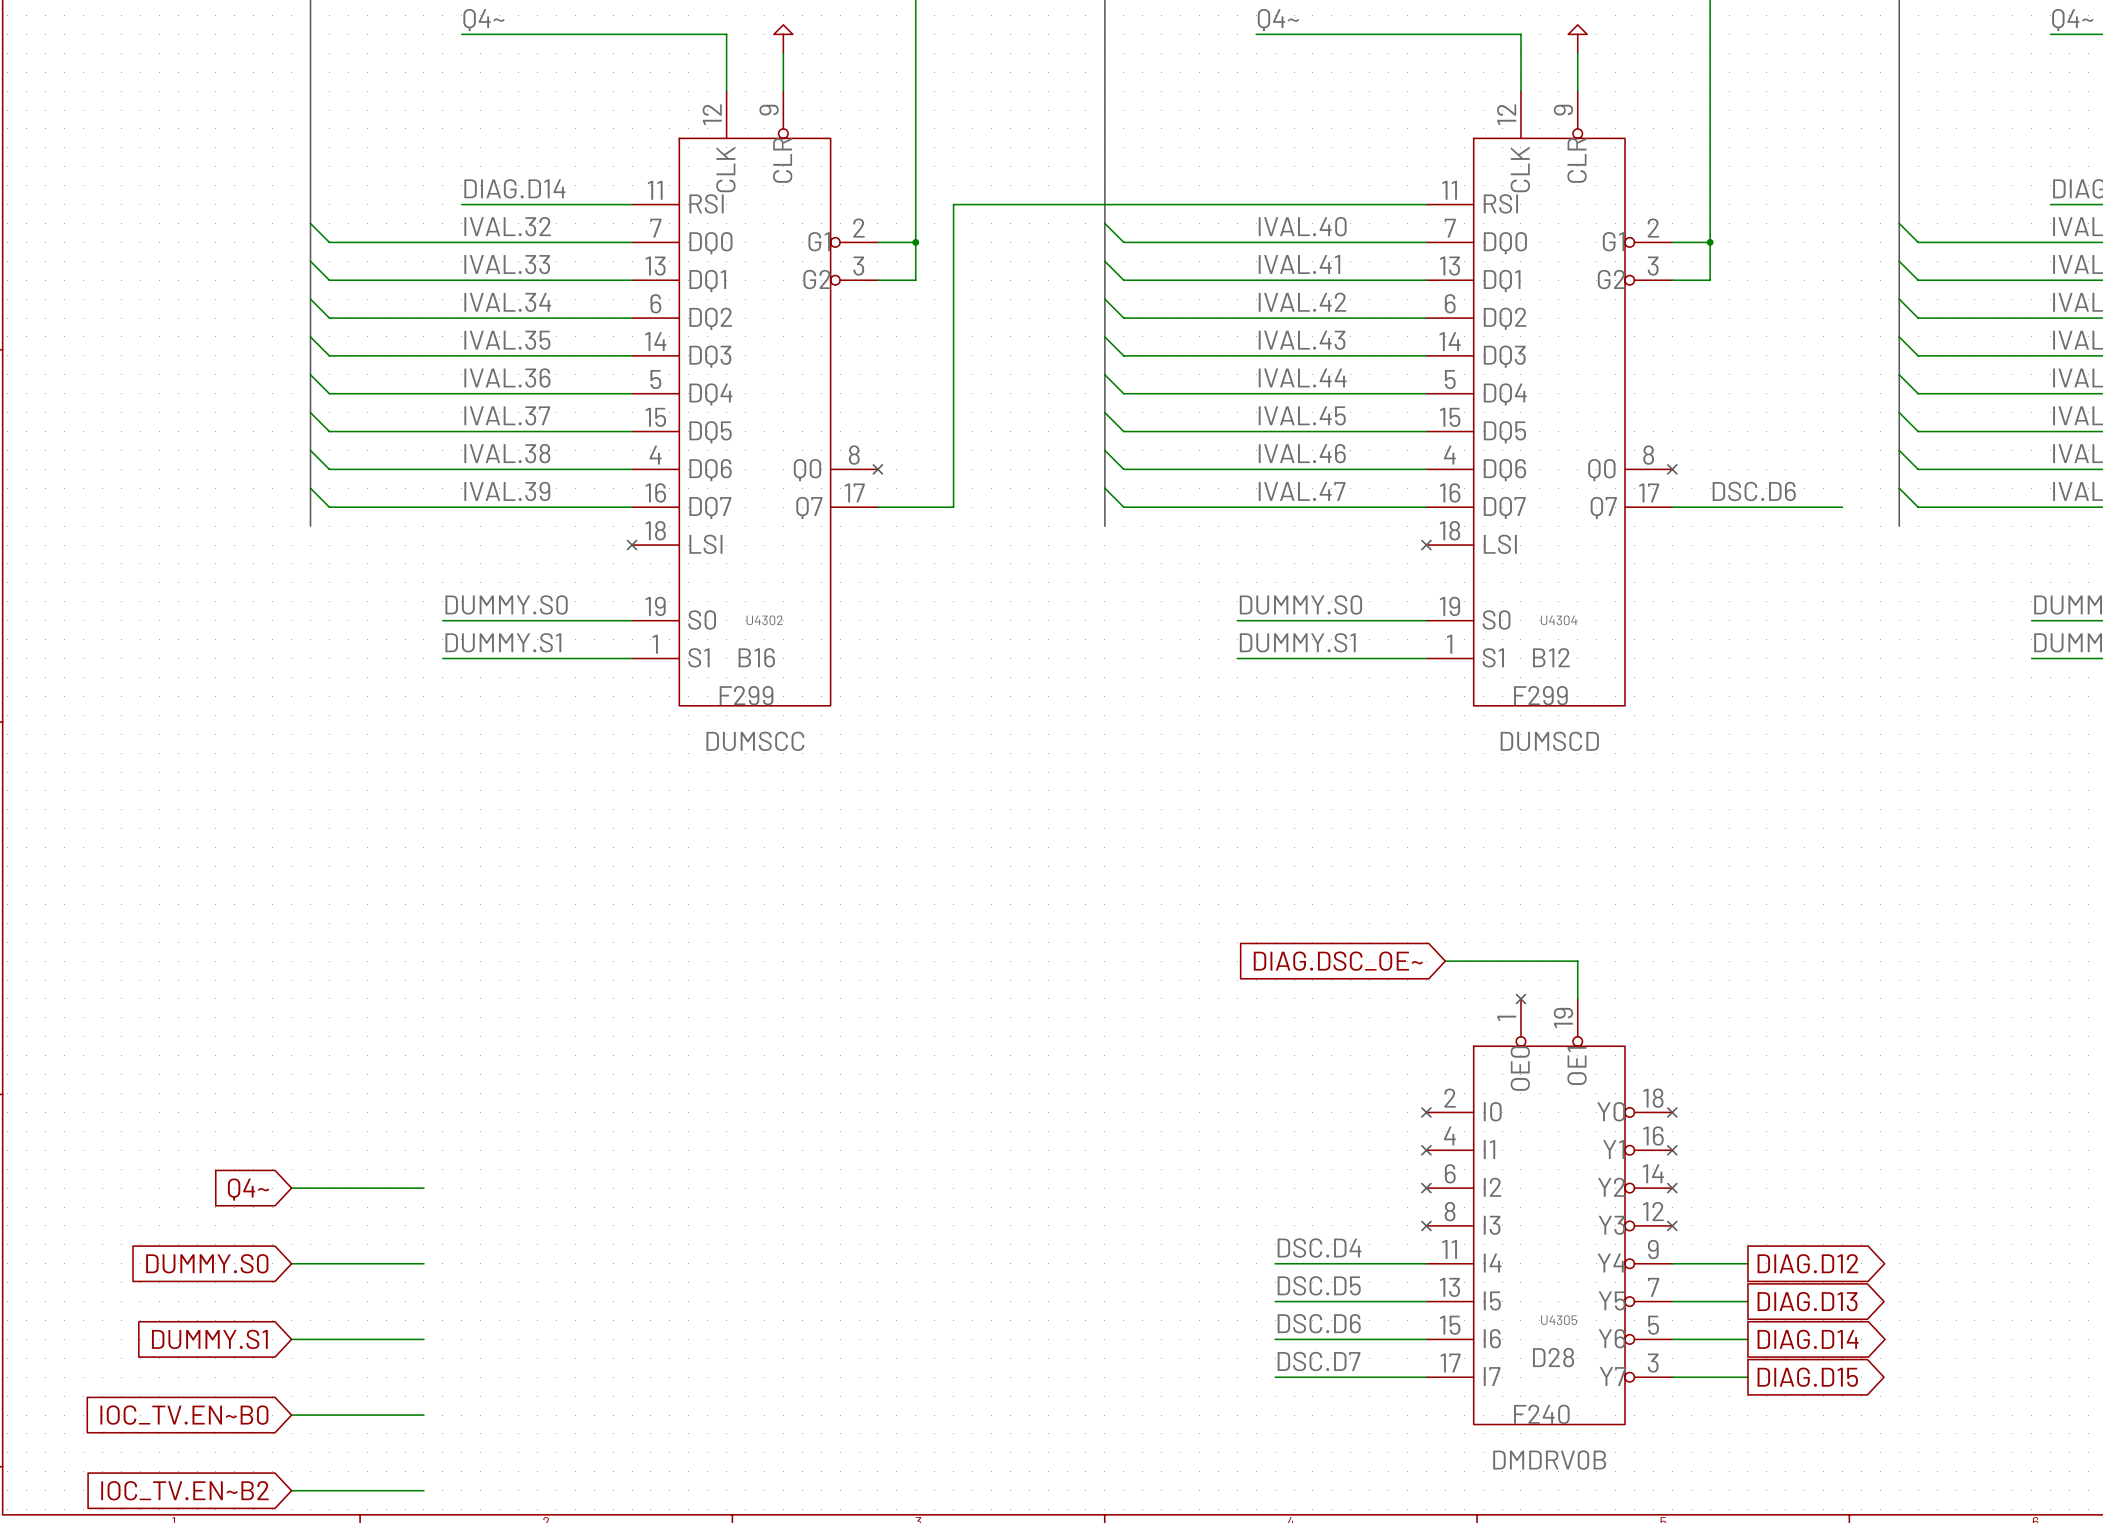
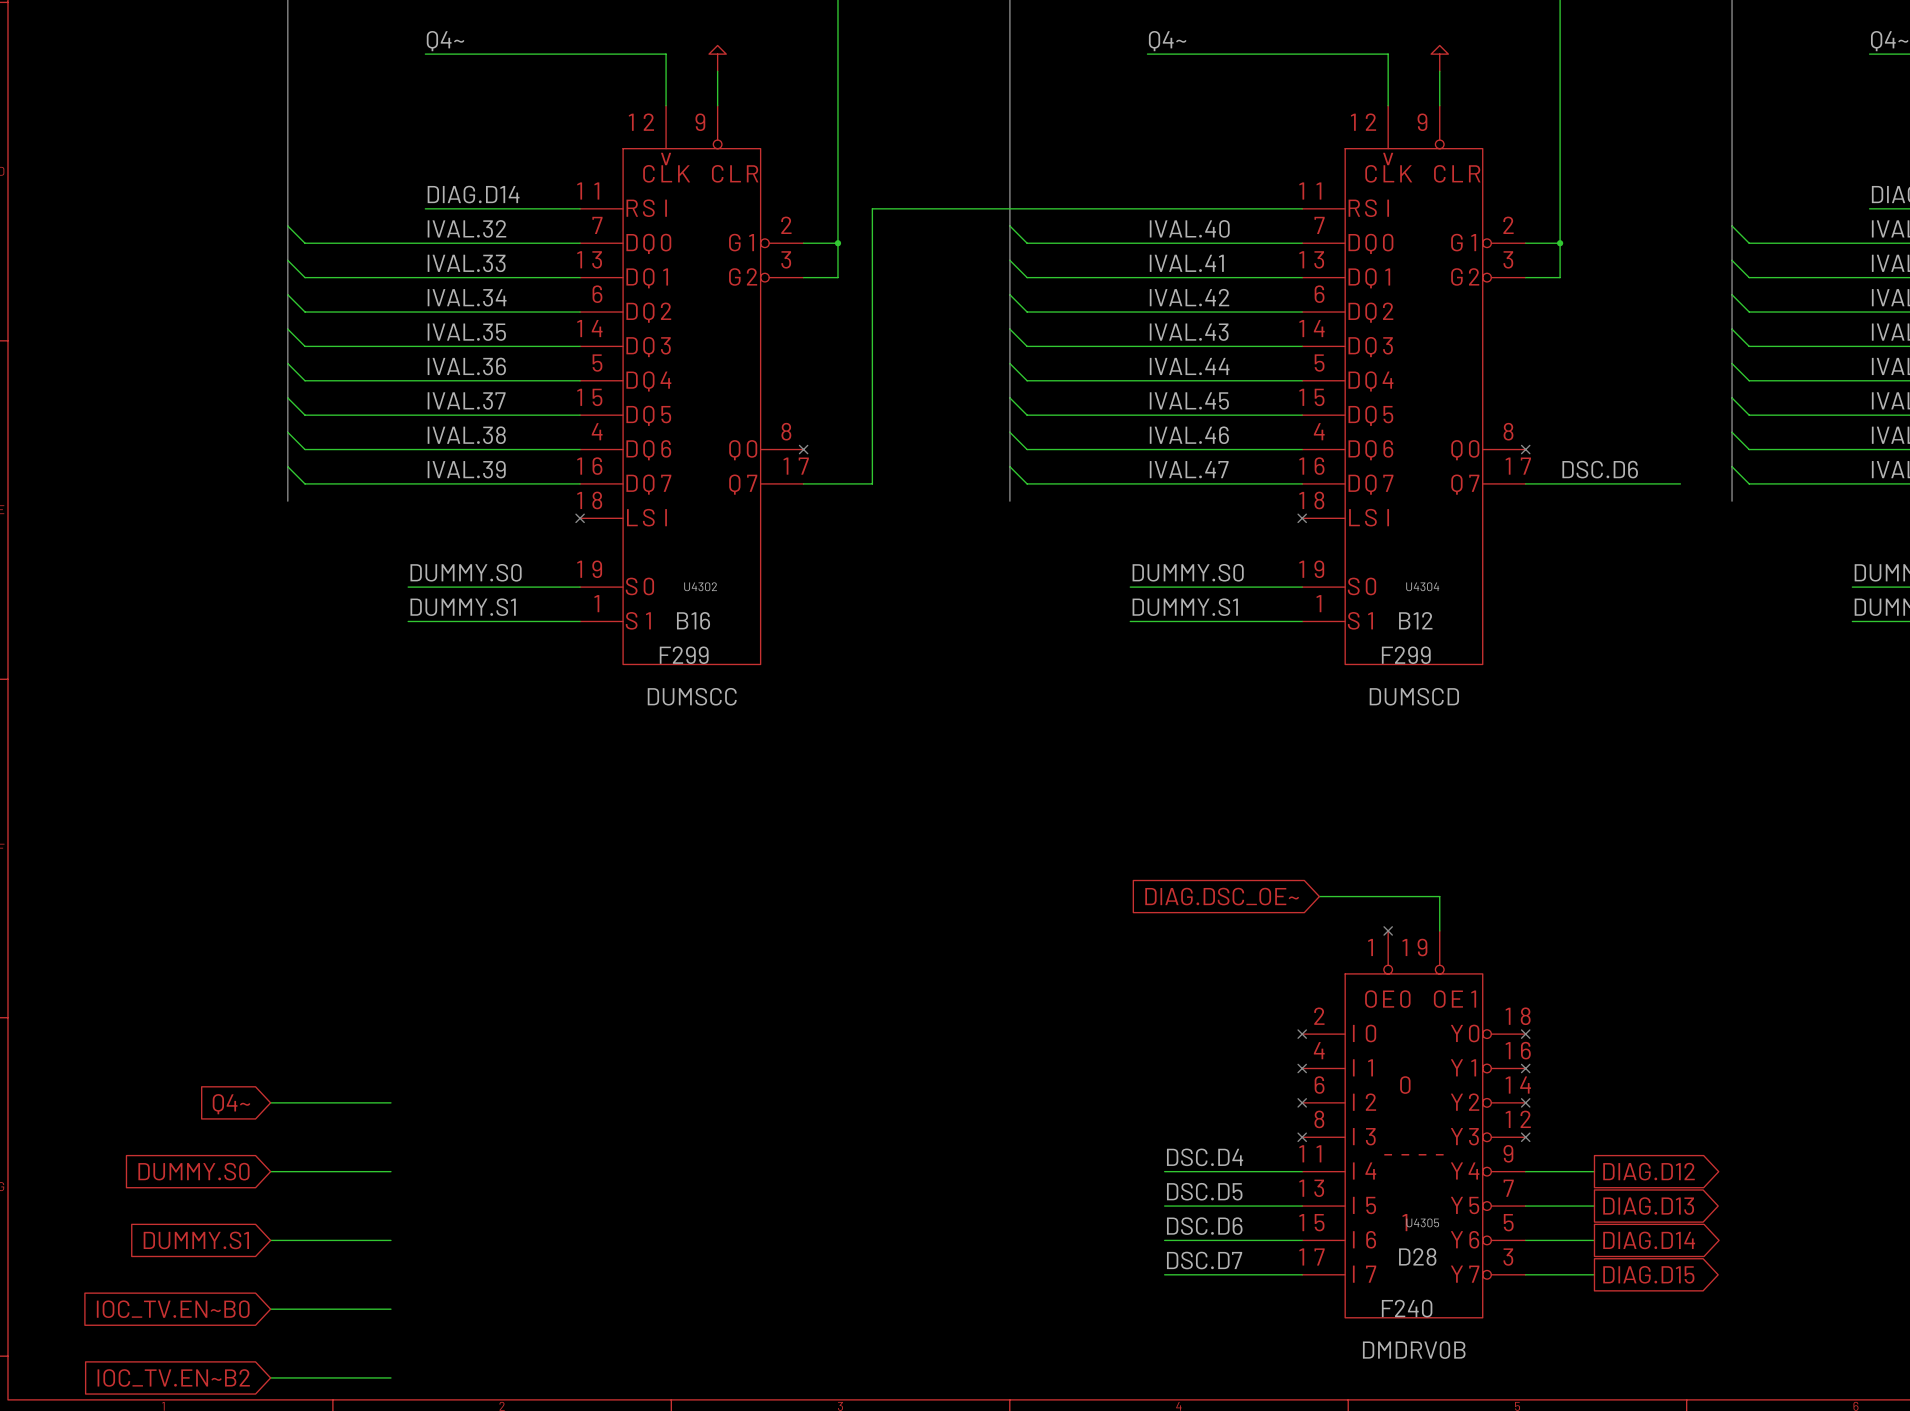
U4302 symbol: [632, 91, 878, 706] -> [580, 105, 804, 665]
U4304 symbol: [1426, 91, 1673, 706] -> [1302, 105, 1526, 665]
U4305 symbol: [1426, 998, 1673, 1425] -> [1302, 930, 1526, 1318]

